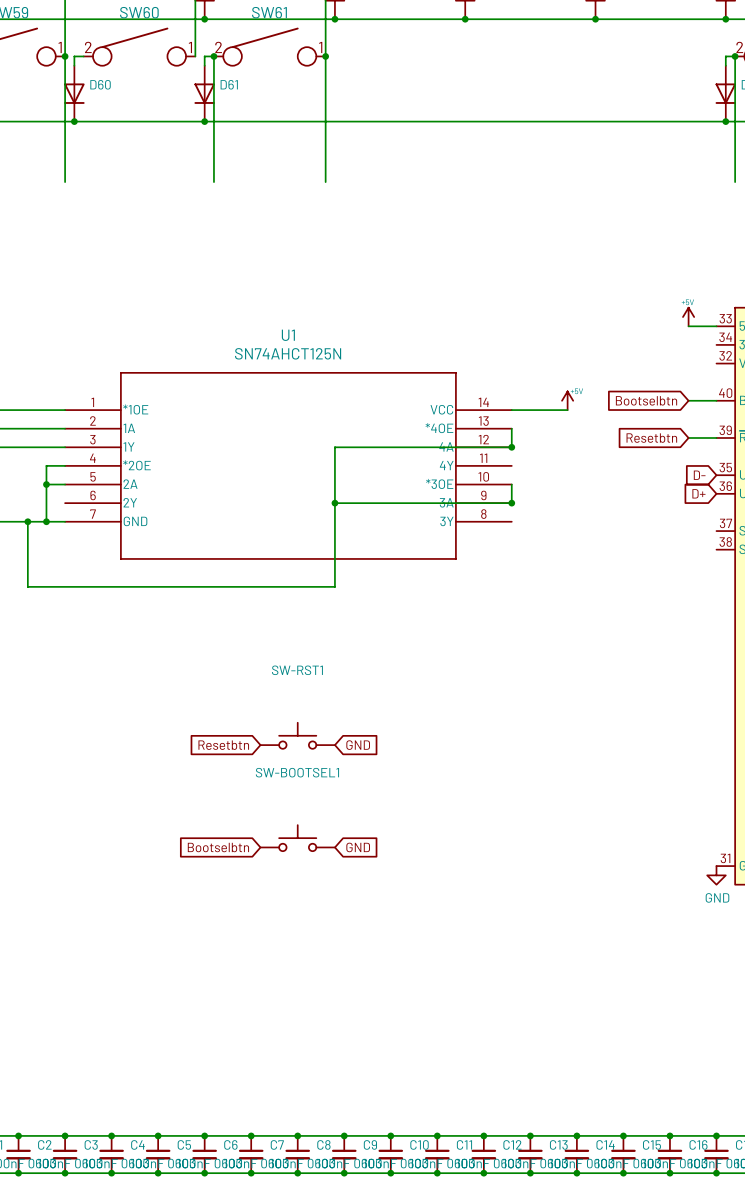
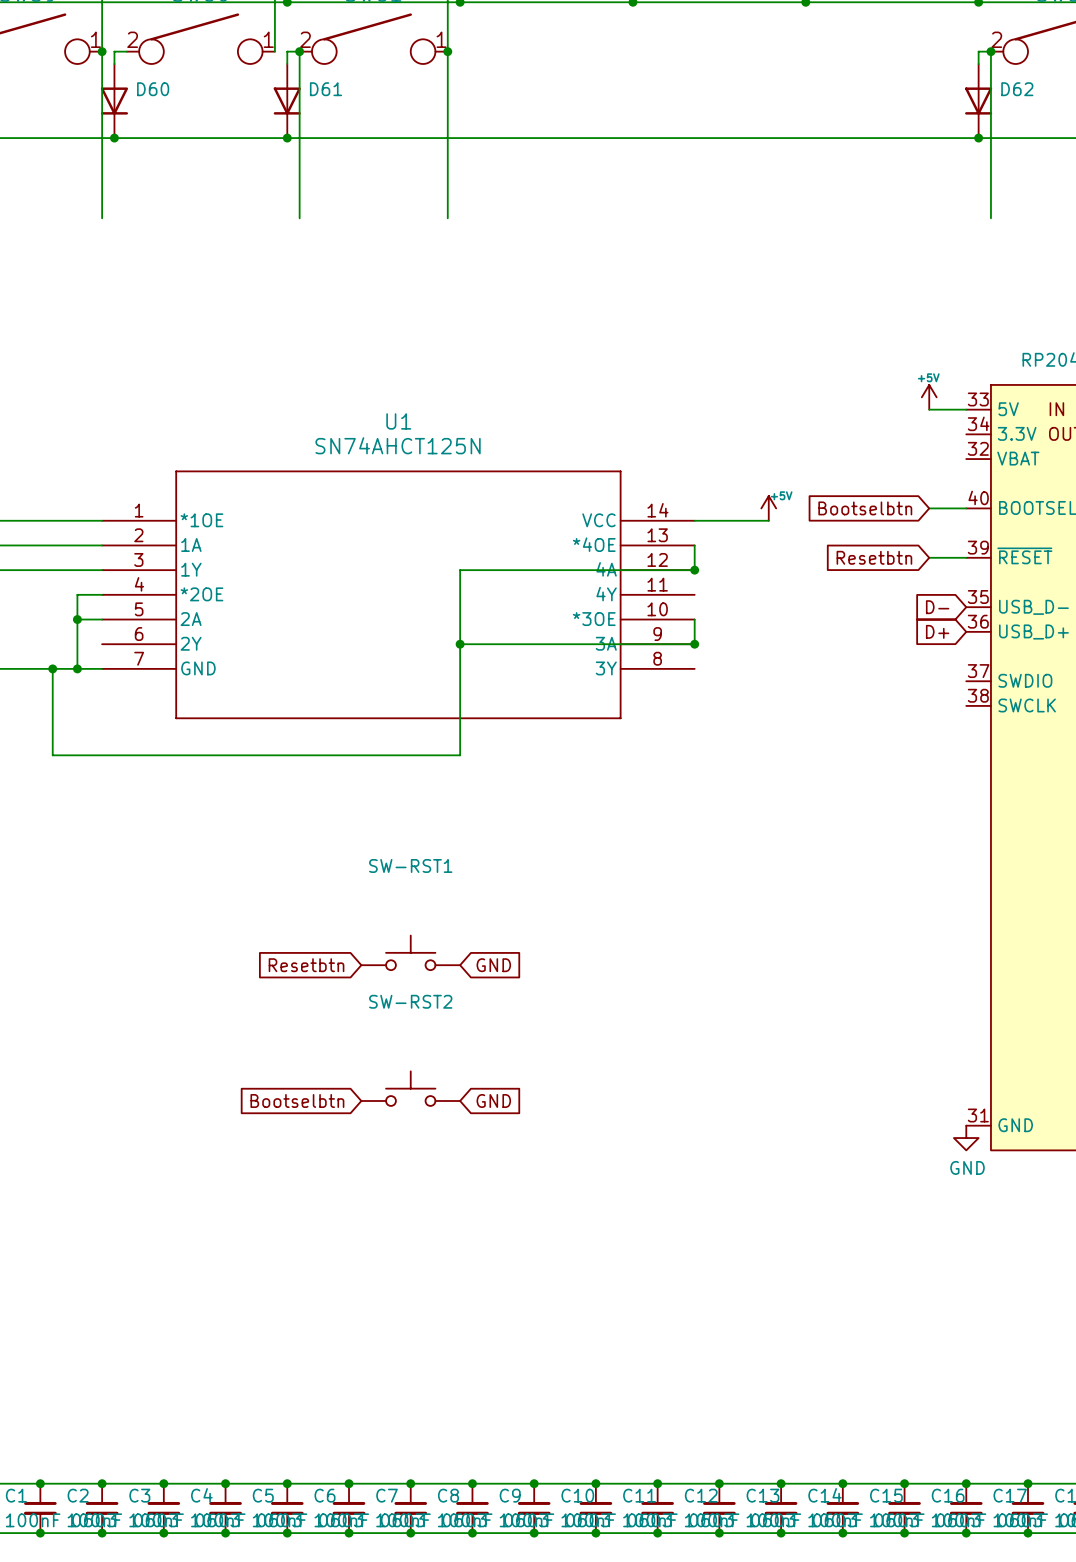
SW-BOOTSEL1 name: SW-BOOTSEL1 (297, 772) -> SW-RST2 (410, 1001)

